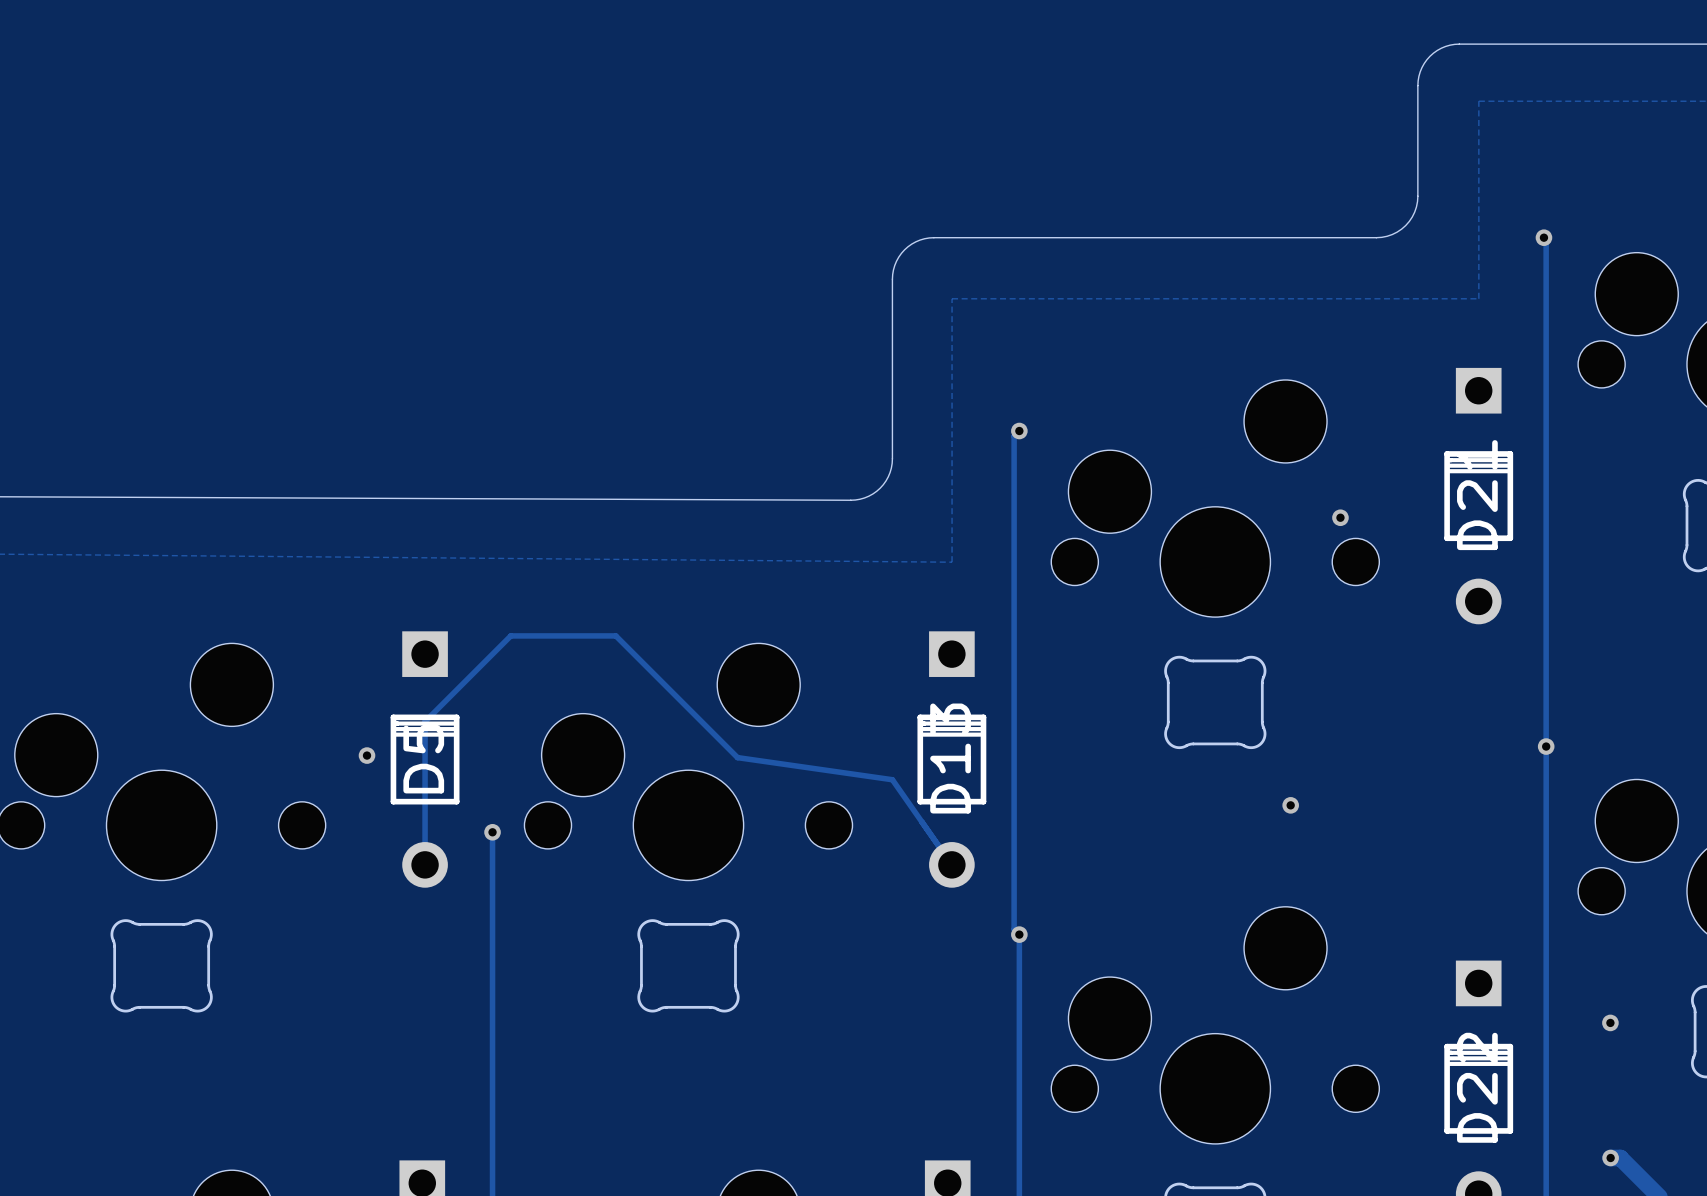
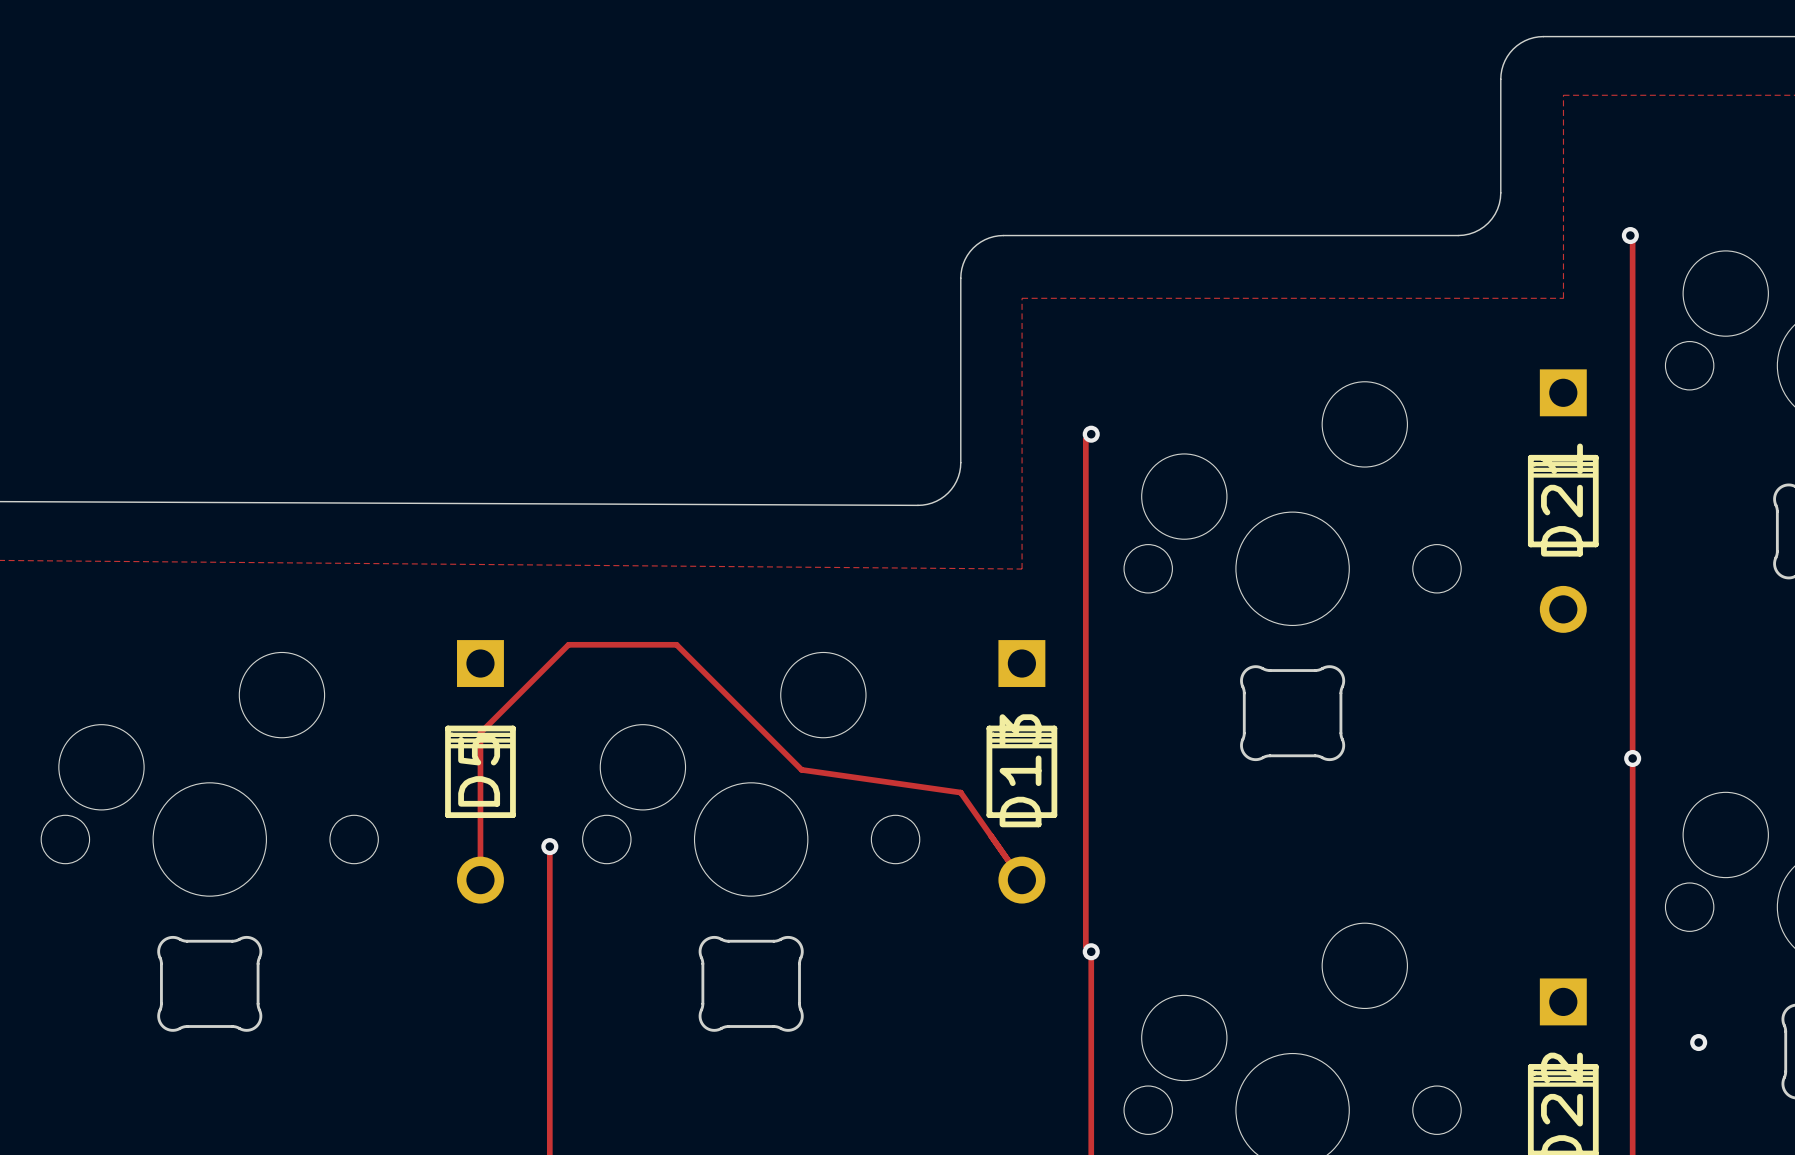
via: (1340, 517) -> none
via: (367, 755) -> none
via: (1290, 805) -> none

